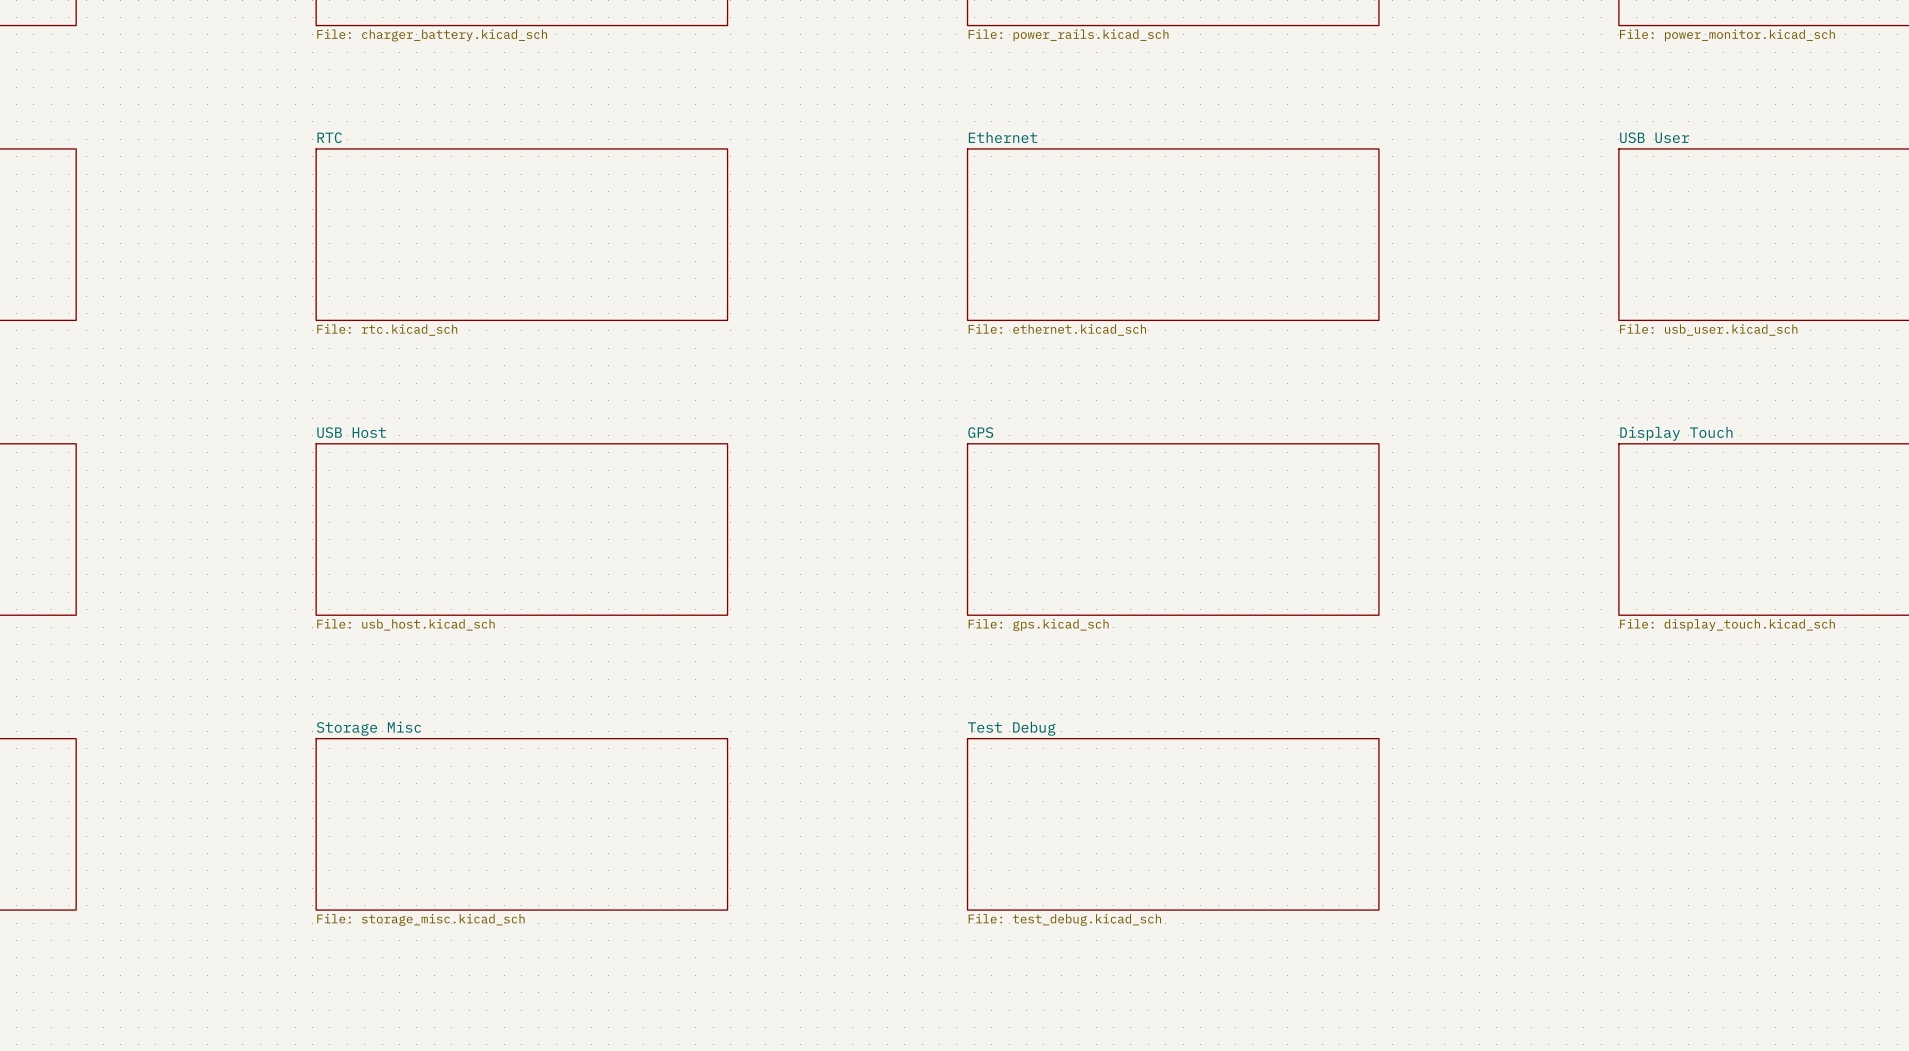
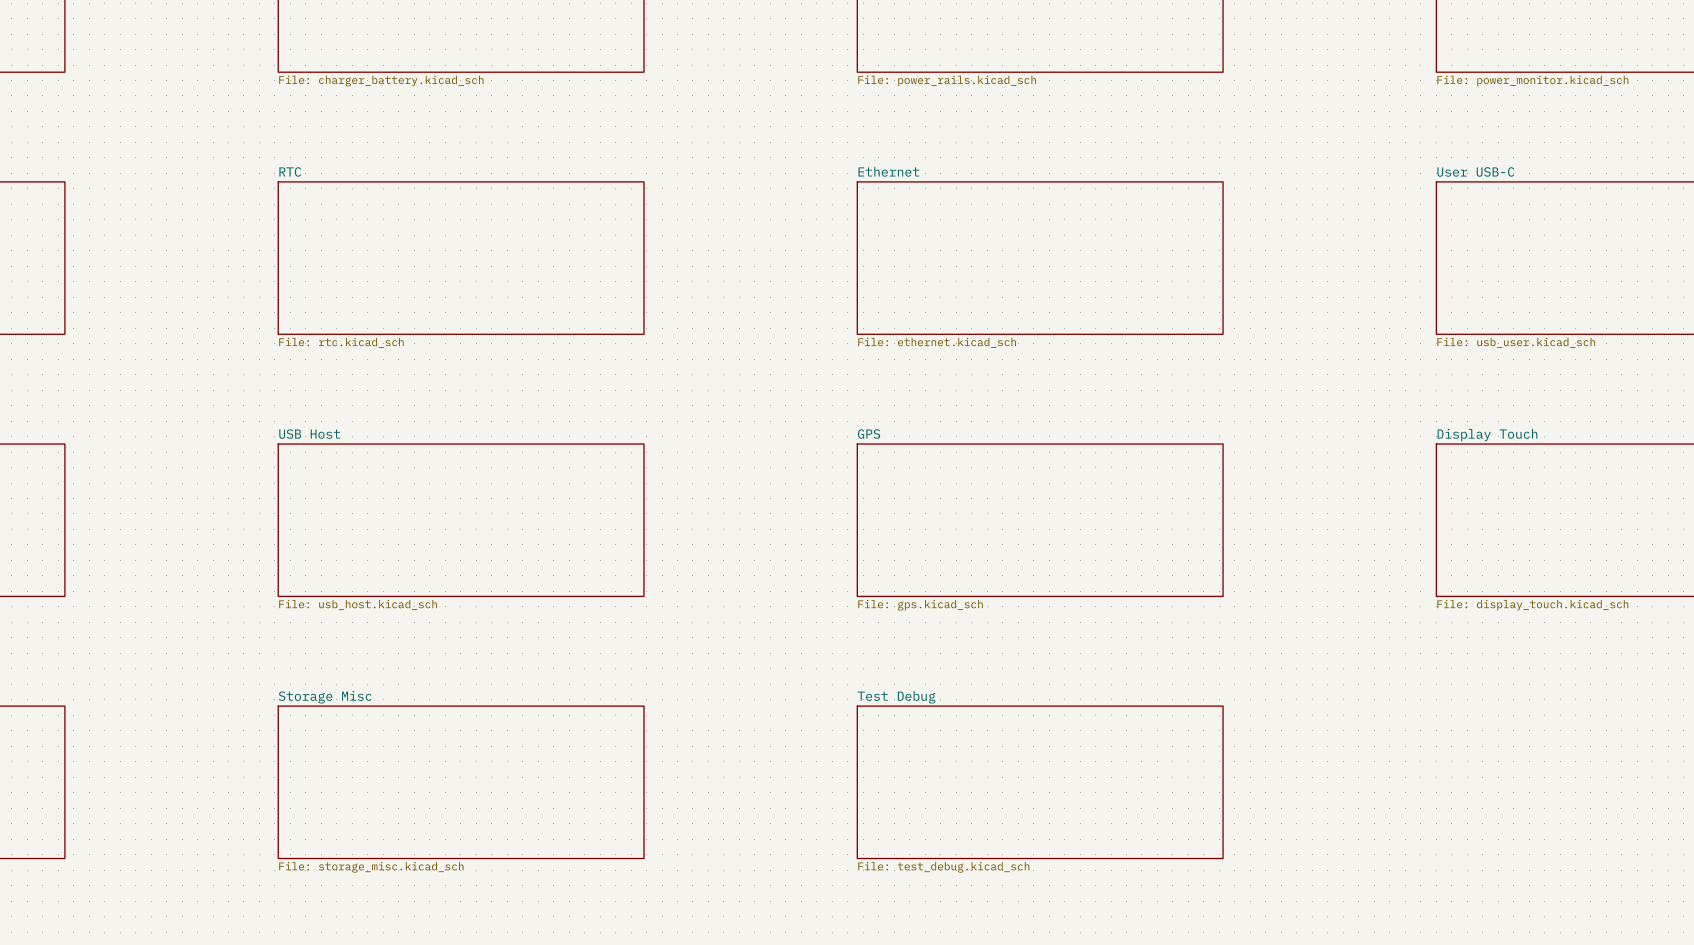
sheet USB User name: USB User (1654, 137) -> User USB-C (1475, 171)

